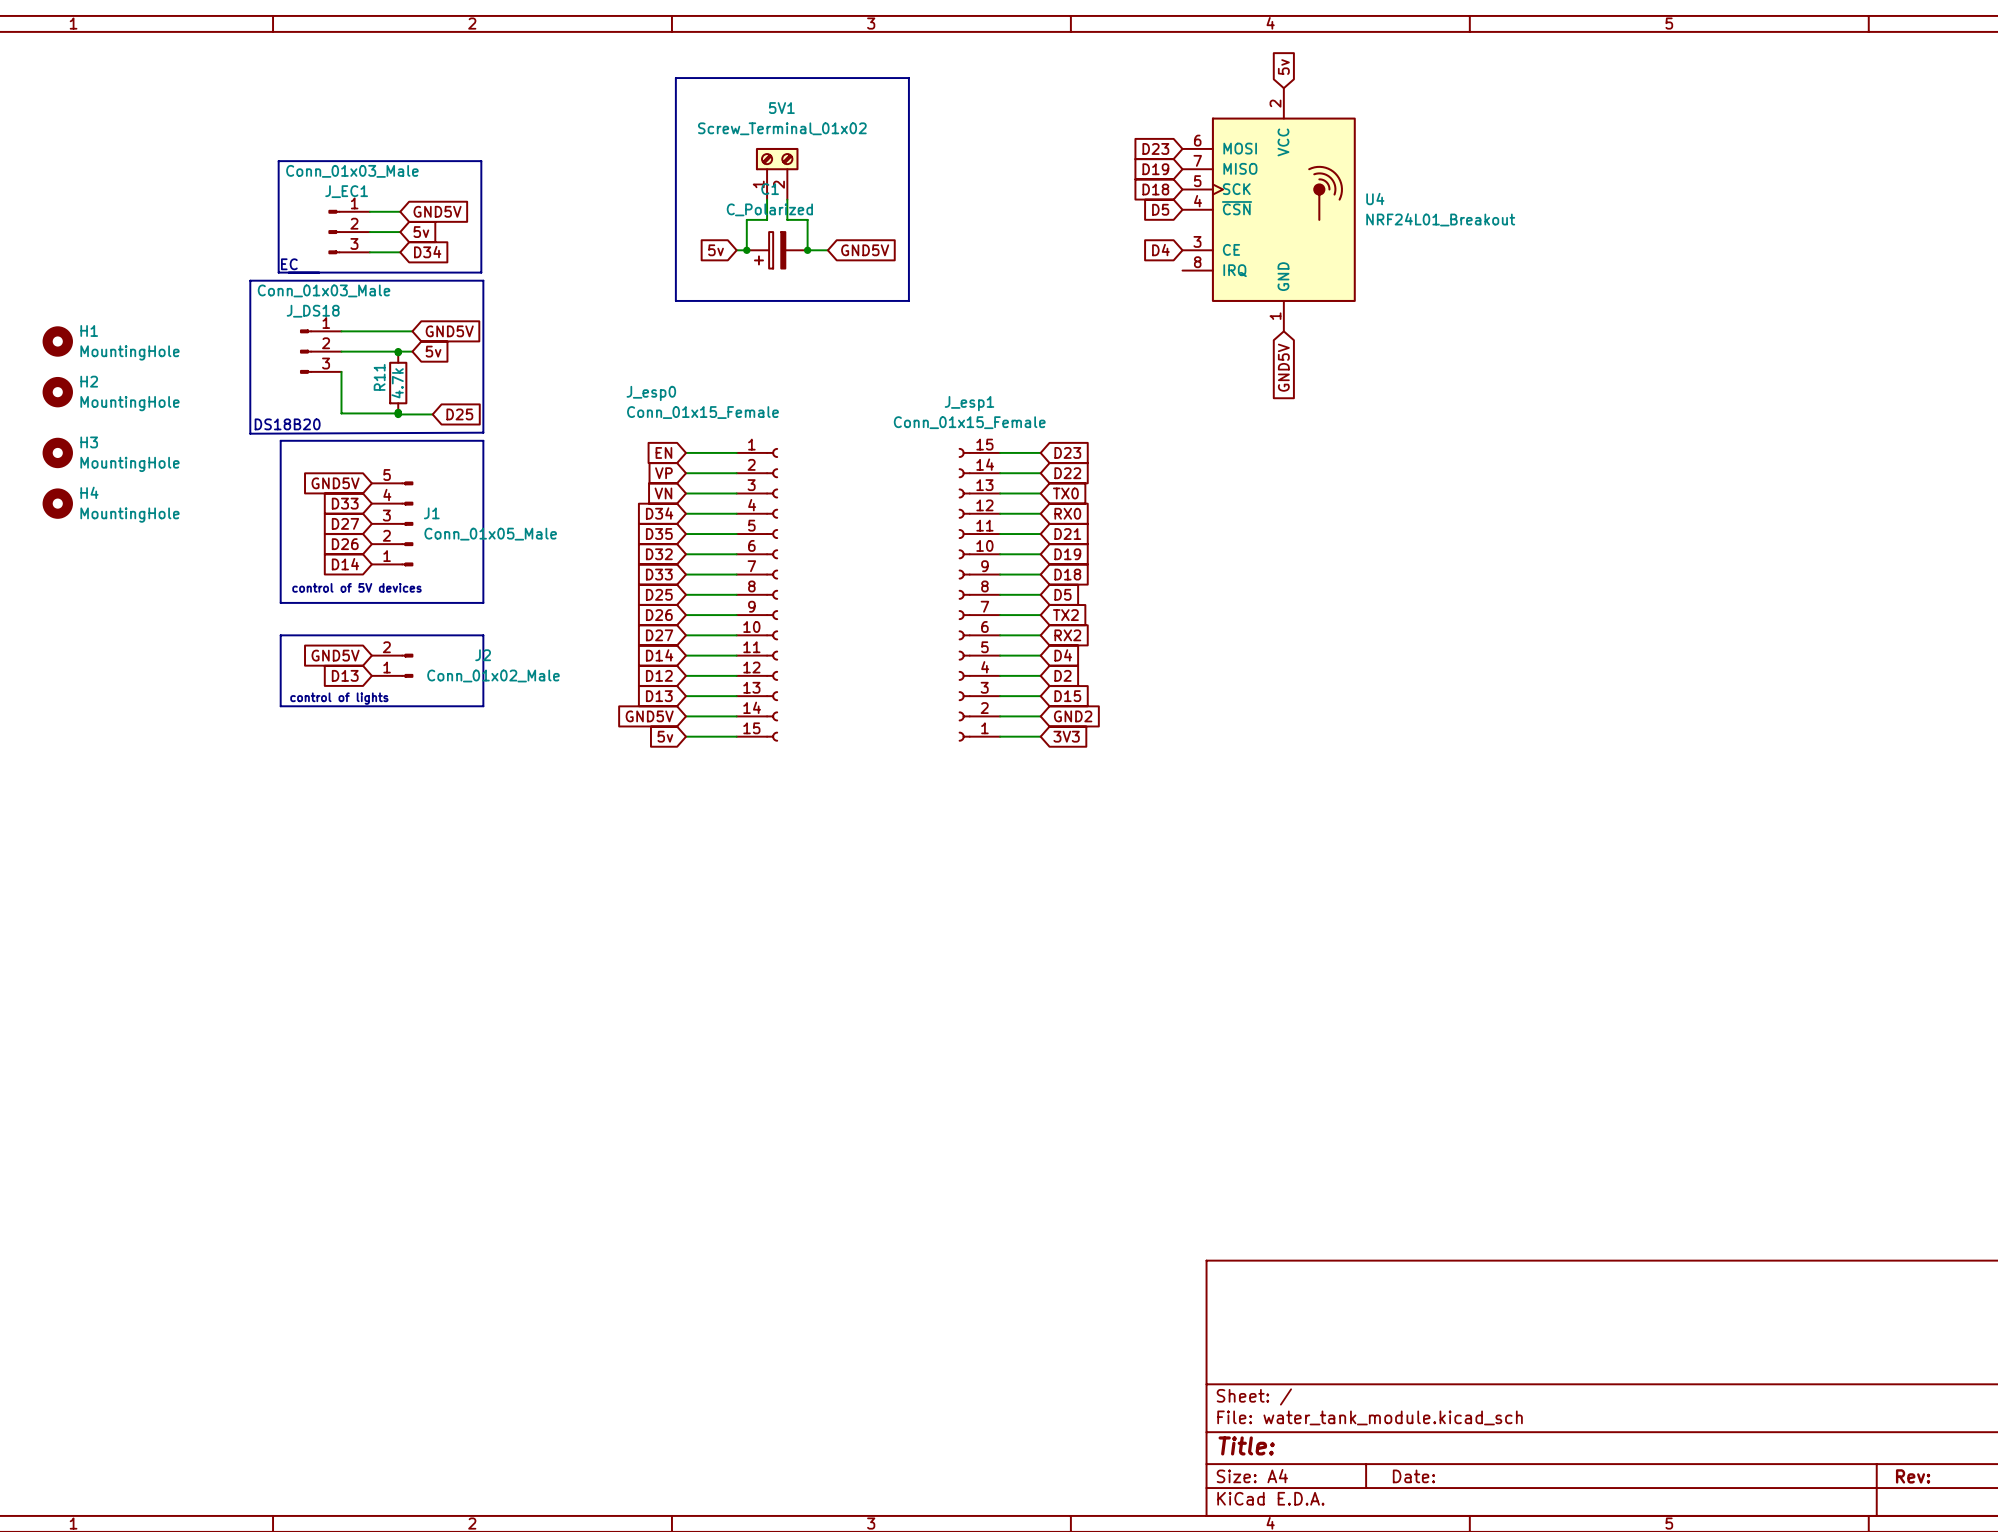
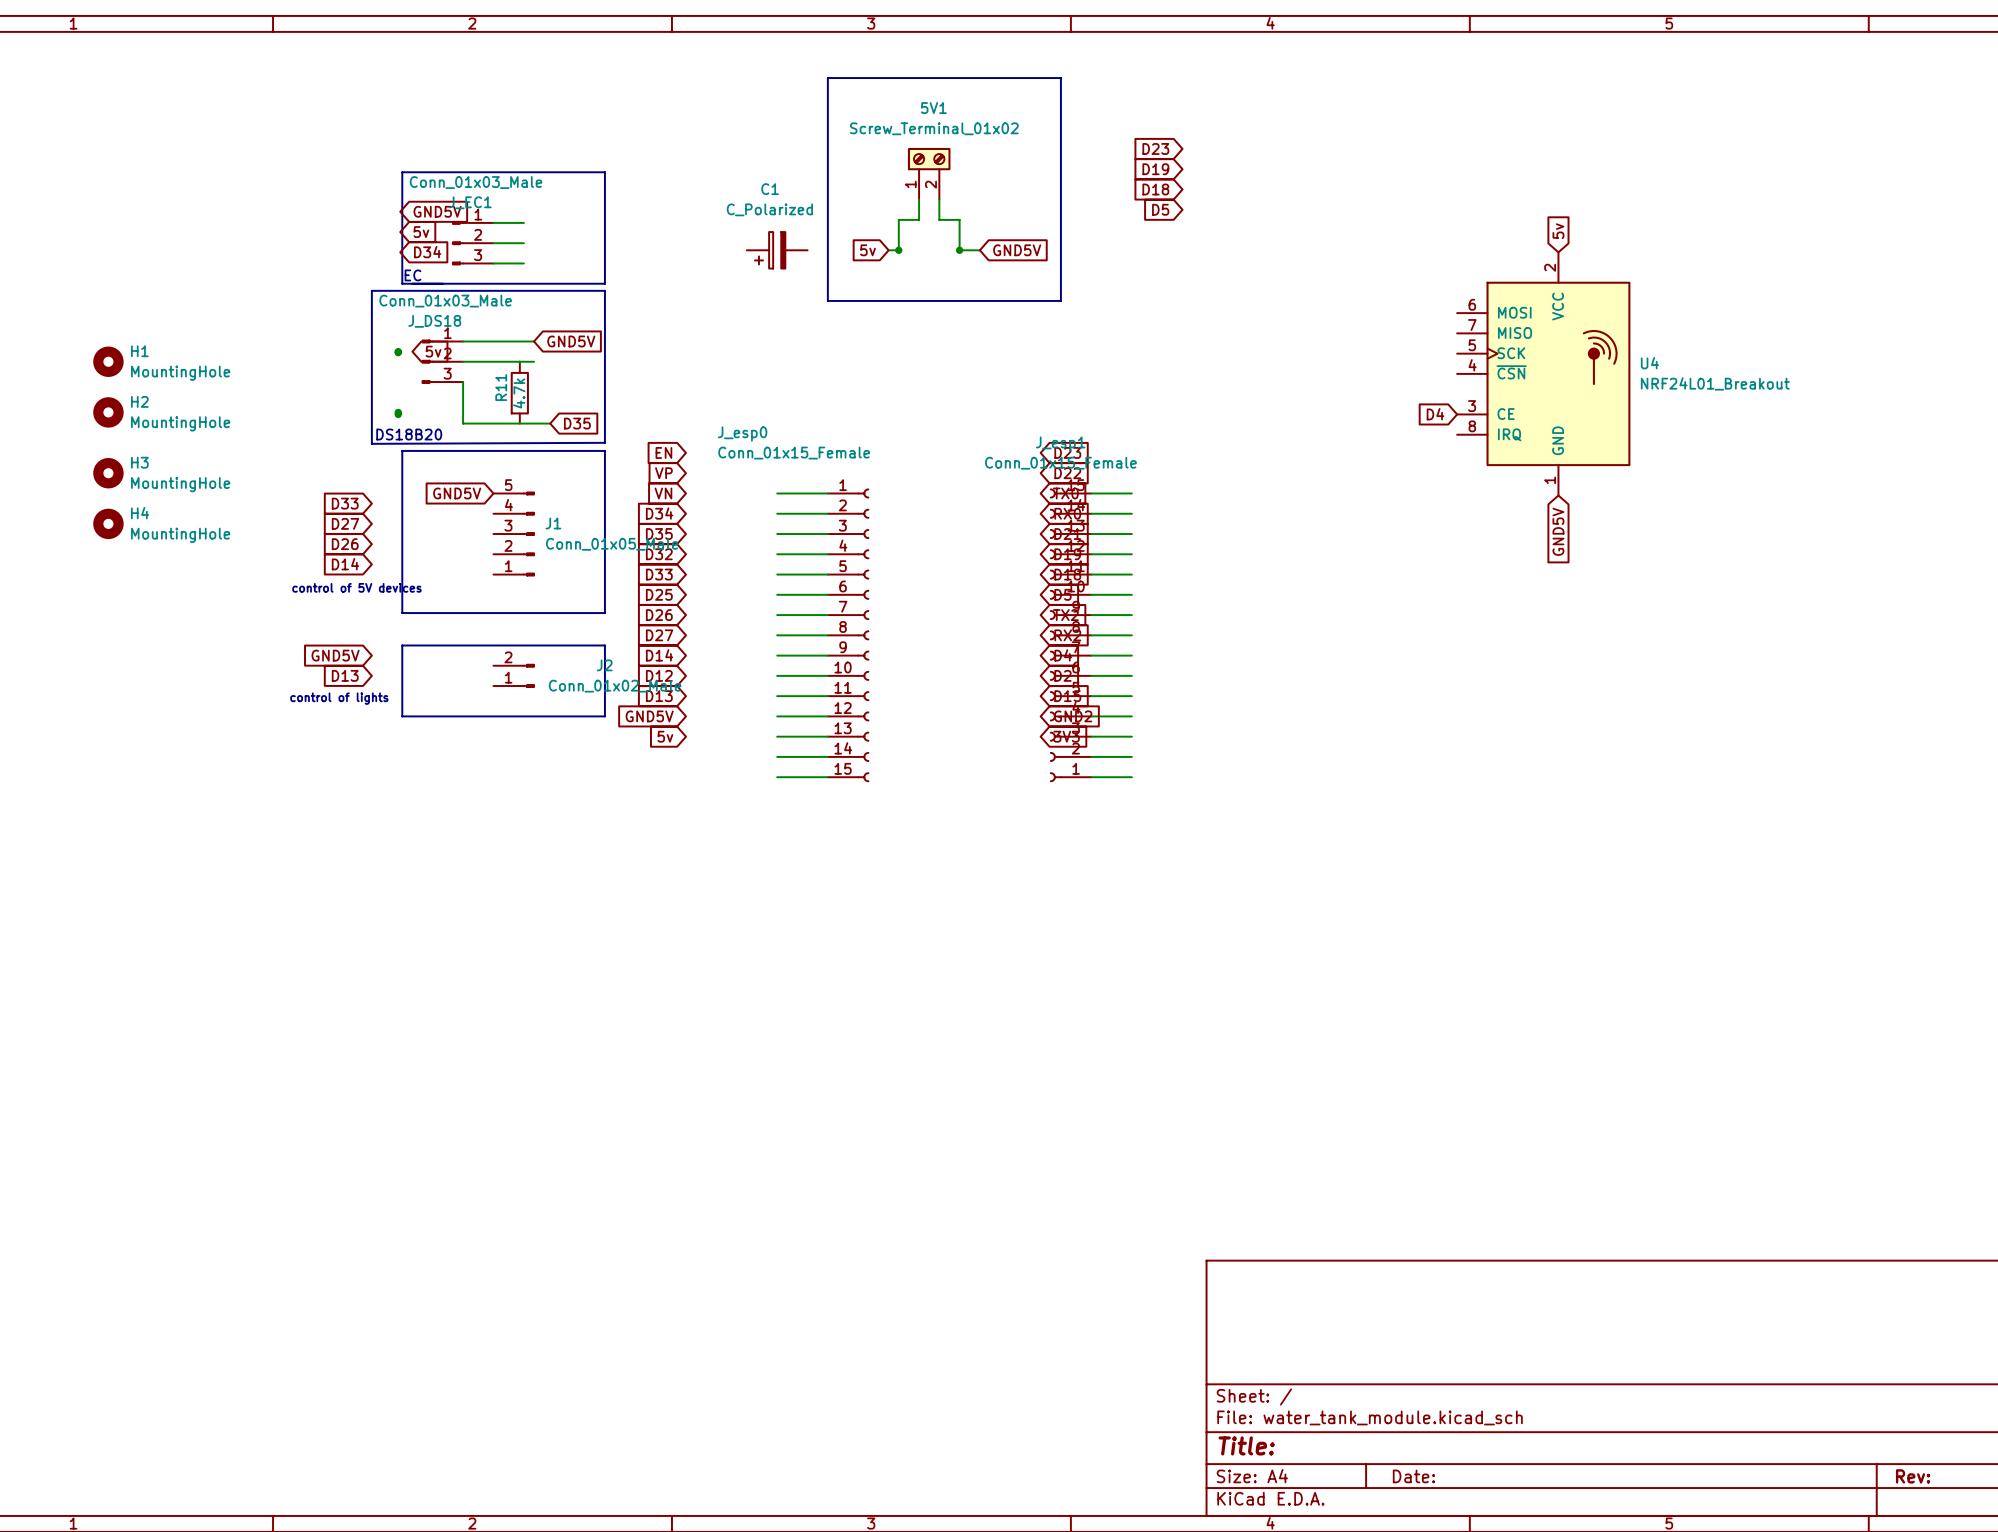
global label: 5v (1283, 67) -> none
line: (827, 78) (675, 78) (675, 300) (827, 300) -> (827, 78) (827, 300)
line: (908, 78) (908, 300) -> (908, 78) (1060, 78) (1060, 300) (908, 300)
line: (278, 161) (481, 161) (481, 272) (278, 272) (278, 161) -> (402, 172) (604, 172) (604, 283) (402, 283) (402, 172)
5V1 position: (777, 173) -> (929, 173)
wire: (767, 199) (767, 219) (746, 219) (746, 250) (736, 250) -> (919, 199) (919, 219) (898, 219) (898, 250) (888, 250)
wire: (787, 199) (787, 219) (807, 219) (807, 250) (827, 250) -> (939, 199) (939, 219) (959, 219) (959, 250) (979, 250)
U4 position: (1269, 209) -> (1543, 373)
wire: (369, 211) (400, 211) -> (493, 222) (523, 222)
global label: none -> 5v (1558, 231)
J_EC1 position: (349, 232) -> (472, 243)
wire: (369, 232) (400, 232) -> (493, 243) (523, 243)
global label position: 5v (716, 250) -> 5v (868, 250)
junction: (746, 250) -> none
junction: (807, 250) -> none
global label position: GND5V (865, 250) -> GND5V (1017, 250)
junction: none -> (898, 250)
junction: none -> (959, 250)
global label: D4 (1160, 250) -> none
wire: (369, 252) (400, 252) -> (493, 263) (523, 263)
text position: EC (289, 264) -> EC (412, 275)
line: (250, 280) (483, 280) (483, 432) (250, 433) (250, 280) -> (371, 290) (604, 290) (604, 442) (371, 443) (371, 290)
wire: (341, 331) (412, 331) -> (463, 341) (534, 341)
global label: GND5V (449, 331) -> none
H1 position: (57, 341) -> (108, 361)
global label: none -> GND5V (571, 341)
J_DS18 position: (320, 351) -> (442, 361)
wire: (341, 351) (412, 351) -> (463, 361) (534, 361)
global label: GND5V (1283, 367) -> none
wire: (341, 371) (341, 413) (398, 413) -> none
wire: none -> (463, 382) (463, 423) (550, 423)
R11 position: (398, 383) -> (519, 393)
H2 position: (57, 392) -> (108, 412)
wire: (398, 410) (398, 414) (432, 414) -> none
global label: D25 (459, 414) -> none
global label: none -> D4 (1435, 414)
global label: none -> D35 (577, 423)
text position: DS18B20 (287, 424) -> DS18B20 (409, 434)
line: (280, 440) (280, 602) (483, 602) (483, 440) (280, 440) -> (402, 450) (402, 613) (604, 613) (604, 450) (402, 450)
H3 position: (57, 452) -> (108, 473)
wire: (686, 452) (736, 452) -> (777, 493) (827, 493)
wire: (1000, 452) (1040, 452) -> (1091, 493) (1131, 493)
wire: (686, 473) (736, 473) -> (777, 513) (827, 513)
wire: (1000, 473) (1040, 473) -> (1091, 513) (1131, 513)
global label: GND5V (335, 483) -> none
global label: none -> GND5V (457, 493)
wire: (686, 493) (736, 493) -> (777, 534) (827, 534)
wire: (1000, 493) (1040, 493) -> (1091, 534) (1131, 534)
H4 position: (57, 503) -> (108, 523)
wire: (686, 513) (736, 513) -> (777, 554) (827, 554)
wire: (1000, 513) (1040, 513) -> (1091, 554) (1131, 554)
J1 position: (392, 523) -> (514, 534)
global label: none -> GND5V (1558, 531)
wire: (686, 534) (736, 534) -> (777, 574) (827, 574)
wire: (1000, 534) (1040, 534) -> (1091, 574) (1131, 574)
wire: (686, 554) (736, 554) -> (777, 594) (827, 594)
wire: (1000, 554) (1040, 554) -> (1091, 594) (1131, 594)
wire: (686, 574) (736, 574) -> (777, 615) (827, 615)
wire: (1000, 574) (1040, 574) -> (1091, 615) (1131, 615)
wire: (686, 594) (736, 594) -> (777, 635) (827, 635)
J_esp0 position: (757, 594) -> (848, 635)
J_esp1 position: (979, 594) -> (1070, 635)
wire: (1000, 594) (1040, 594) -> (1091, 635) (1131, 635)
wire: (686, 615) (736, 615) -> (777, 655) (827, 655)
wire: (1000, 615) (1040, 615) -> (1091, 655) (1131, 655)
line: (280, 635) (483, 635) (483, 706) (280, 706) (280, 635) -> (402, 645) (604, 645) (604, 716) (402, 716) (402, 645)
wire: (686, 635) (736, 635) -> (777, 675) (827, 675)
wire: (1000, 635) (1040, 635) -> (1091, 675) (1131, 675)
wire: (686, 655) (736, 655) -> (777, 696) (827, 696)
wire: (1000, 655) (1040, 655) -> (1091, 696) (1131, 696)
J2 position: (392, 665) -> (514, 675)
wire: (686, 675) (736, 675) -> (777, 716) (827, 716)
wire: (1000, 675) (1040, 675) -> (1091, 716) (1131, 716)
wire: (686, 696) (736, 696) -> (777, 736) (827, 736)
wire: (1000, 696) (1040, 696) -> (1091, 736) (1131, 736)
wire: (686, 716) (736, 716) -> (777, 756) (827, 756)
wire: (1000, 716) (1040, 716) -> (1091, 756) (1131, 756)
wire: (686, 736) (736, 736) -> (777, 777) (827, 777)
wire: (1000, 736) (1040, 736) -> (1091, 777) (1131, 777)

